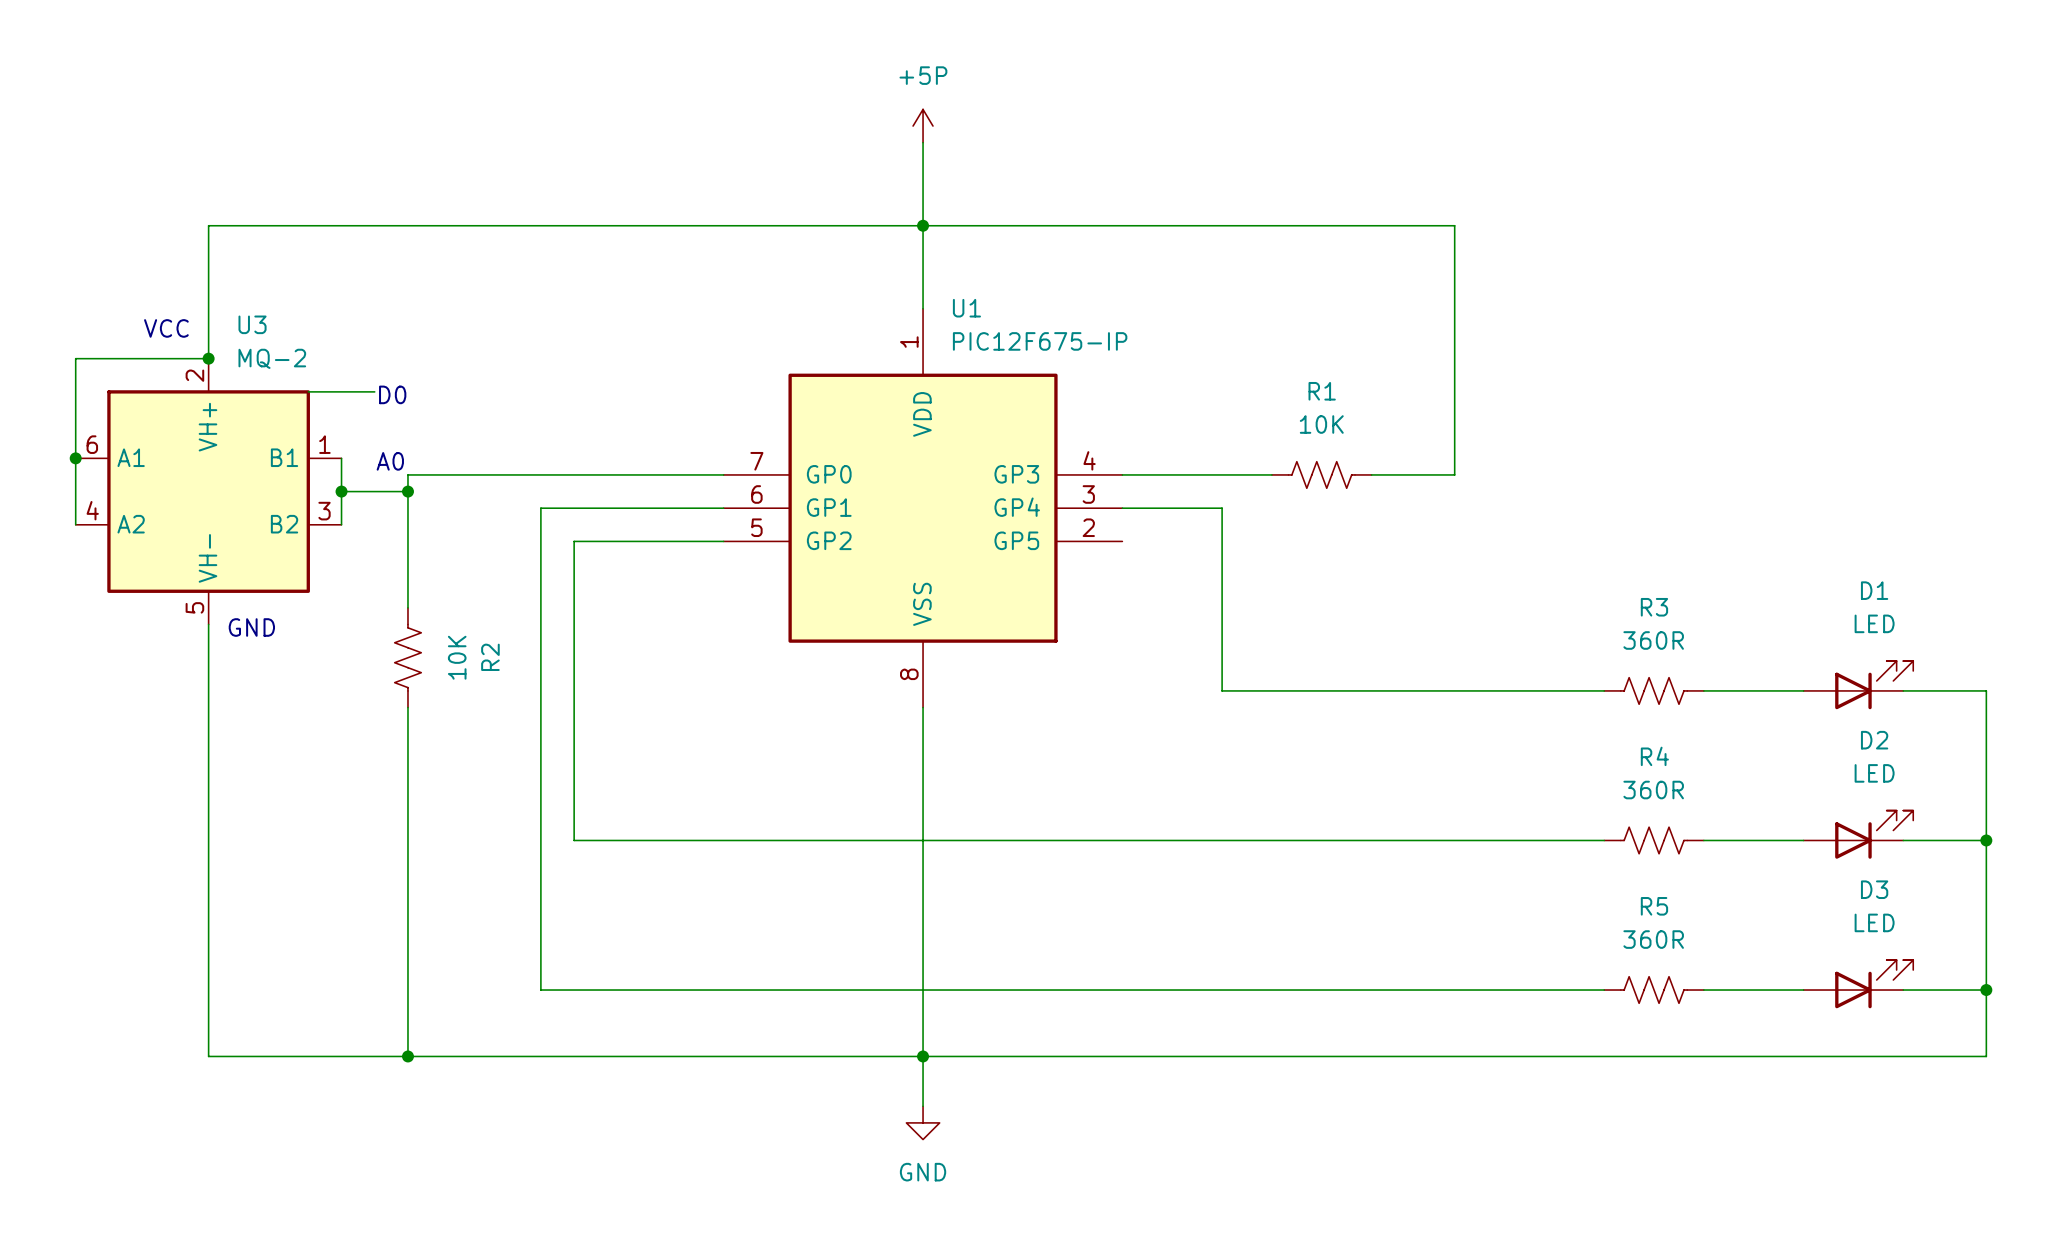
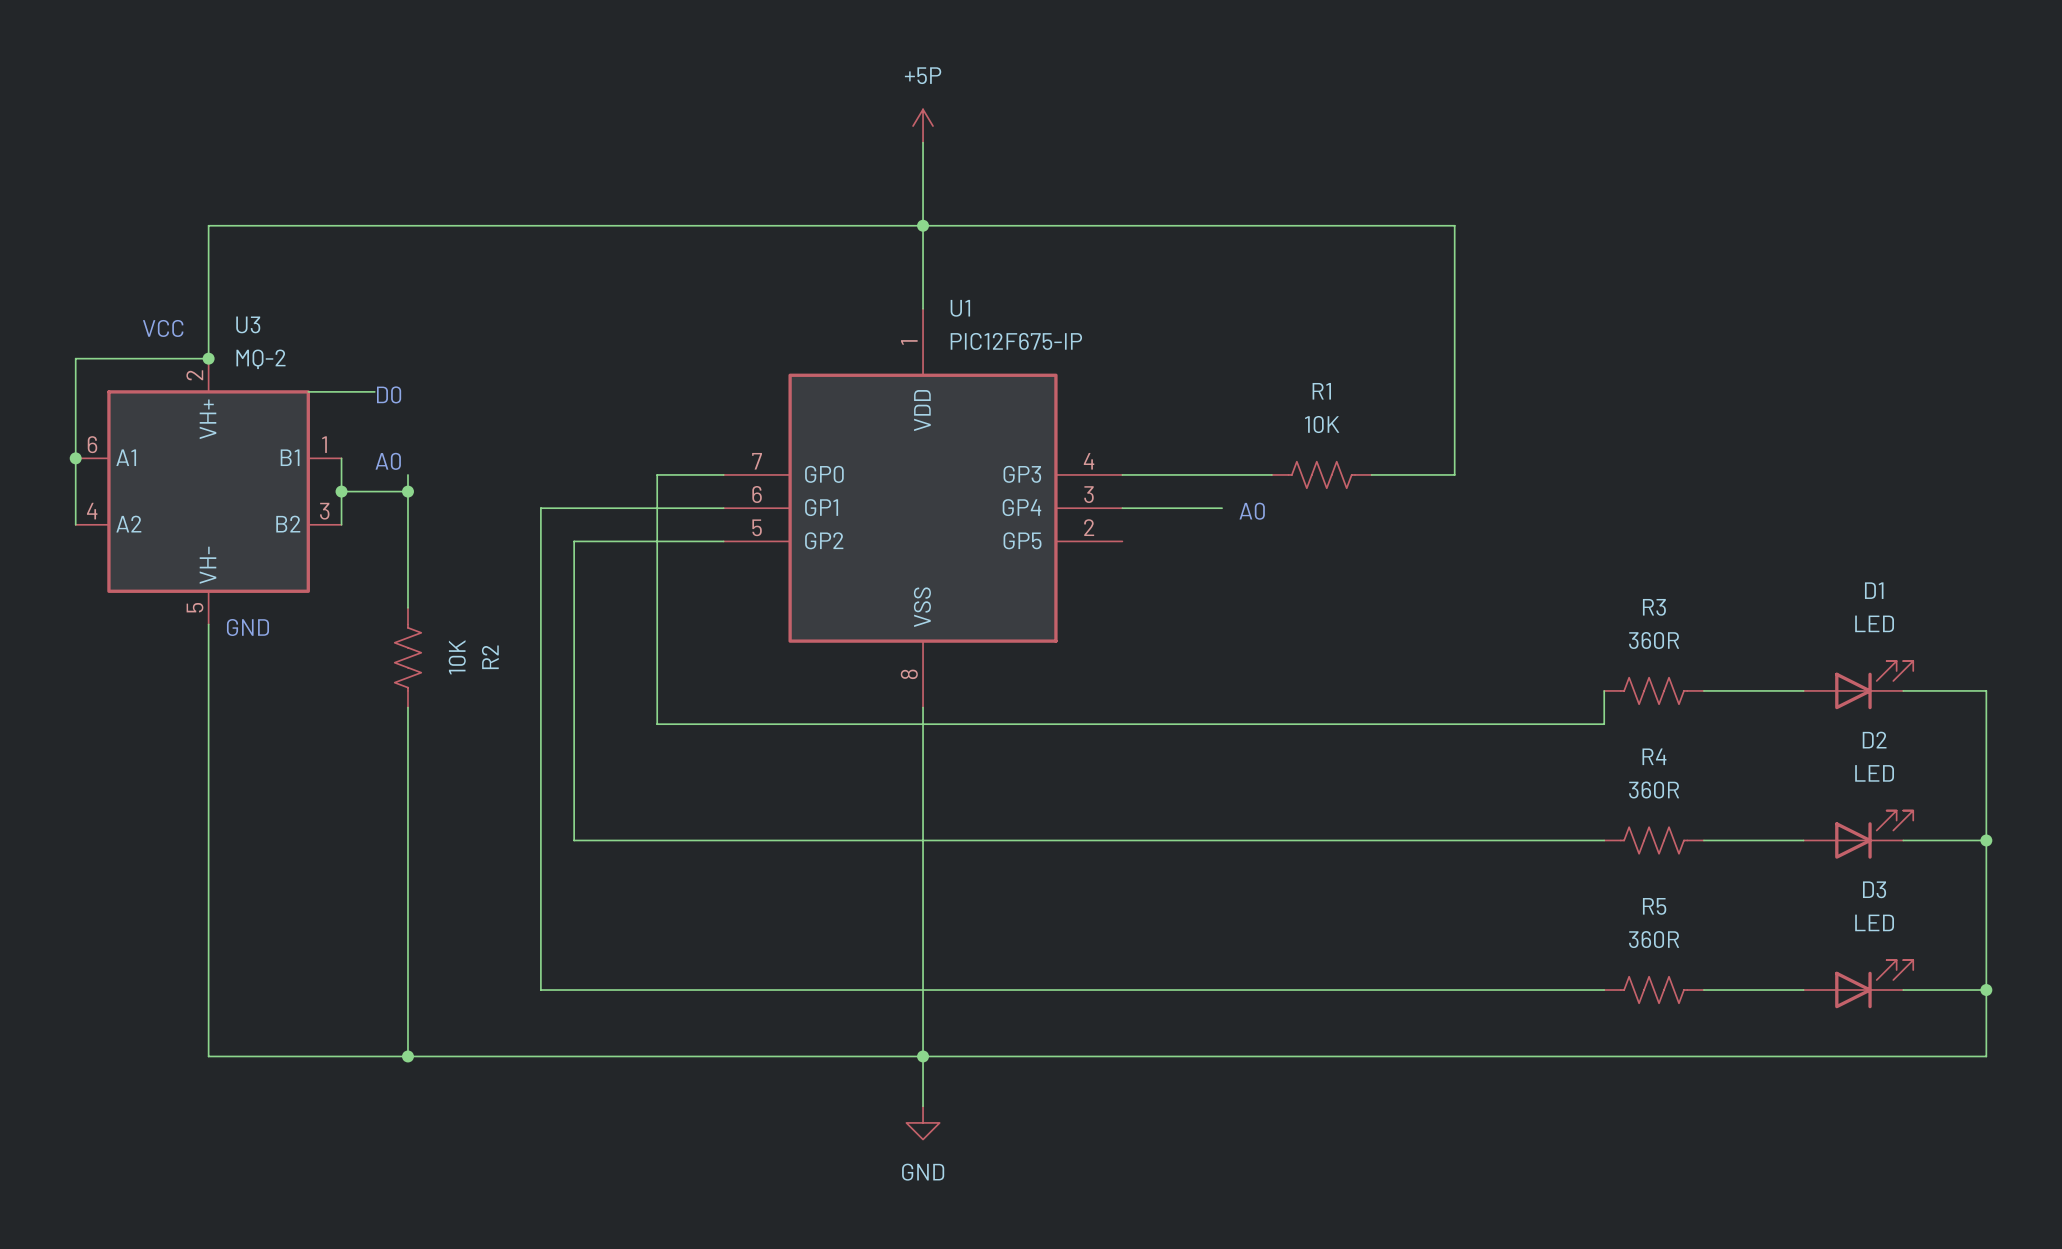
wire: (407, 474) (657, 474) -> none
wire: (1222, 508) (1222, 690) (1604, 690) -> (657, 474) (657, 724) (1604, 724) (1604, 690)
text: none -> A0 (1252, 511)

